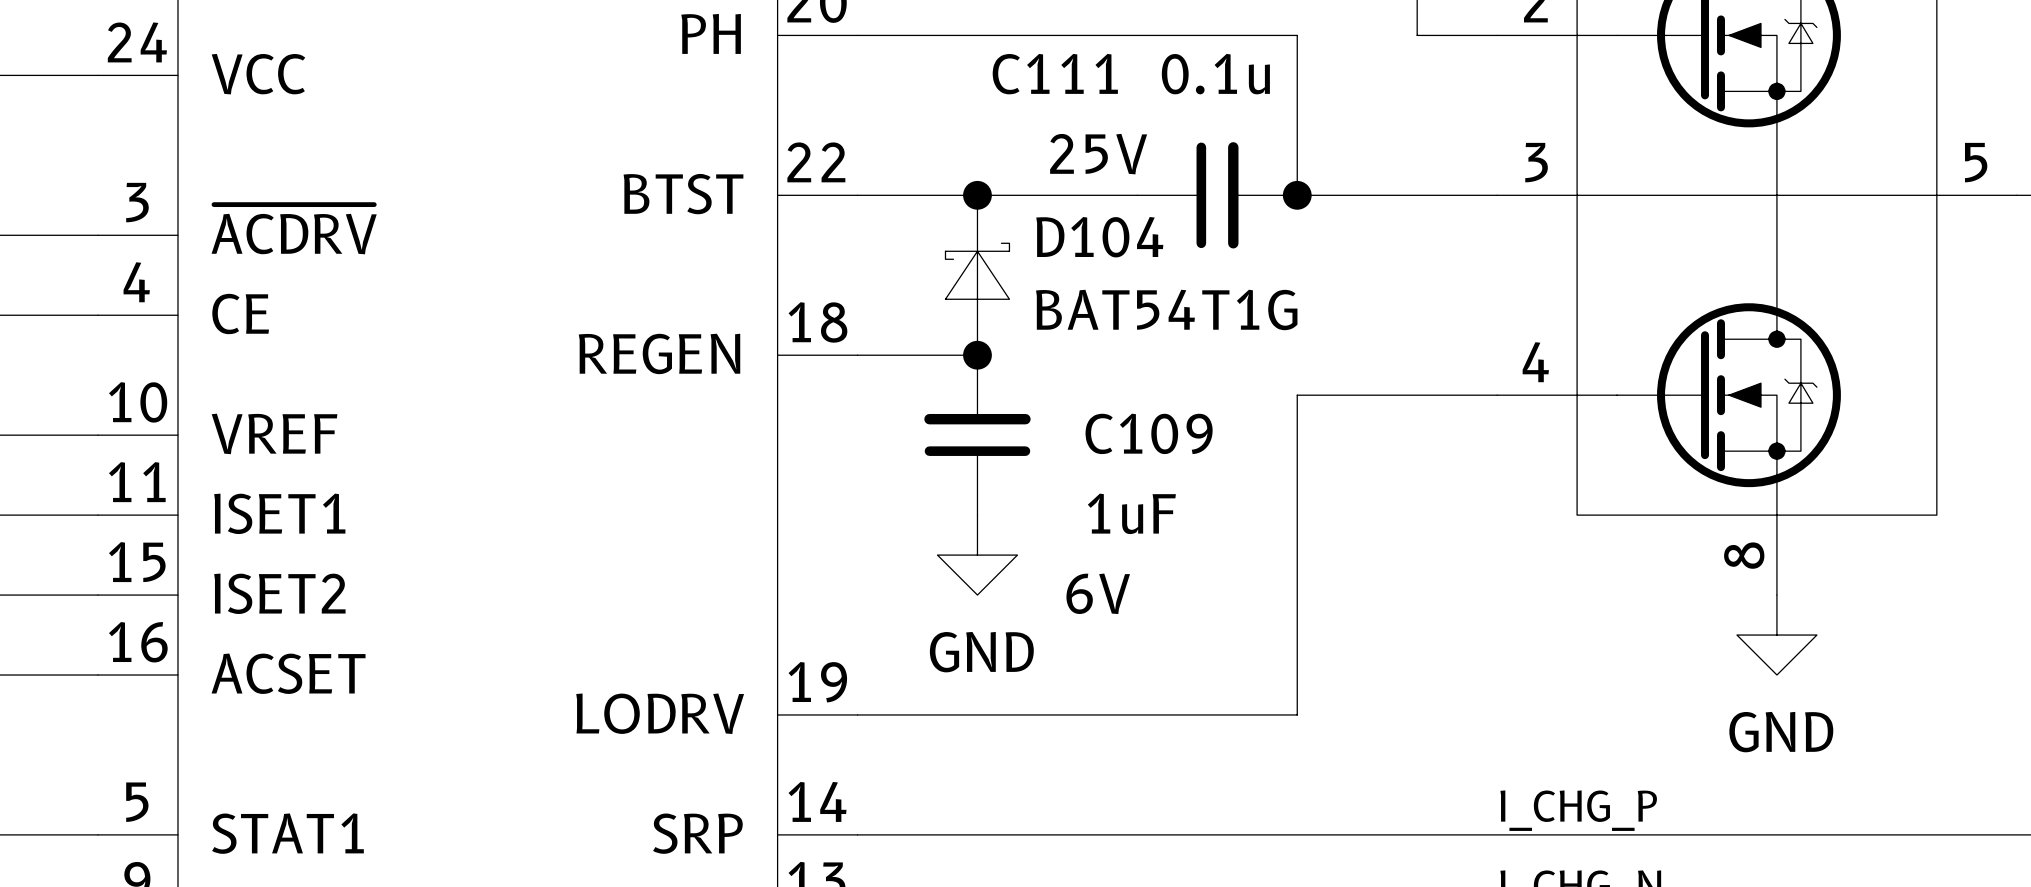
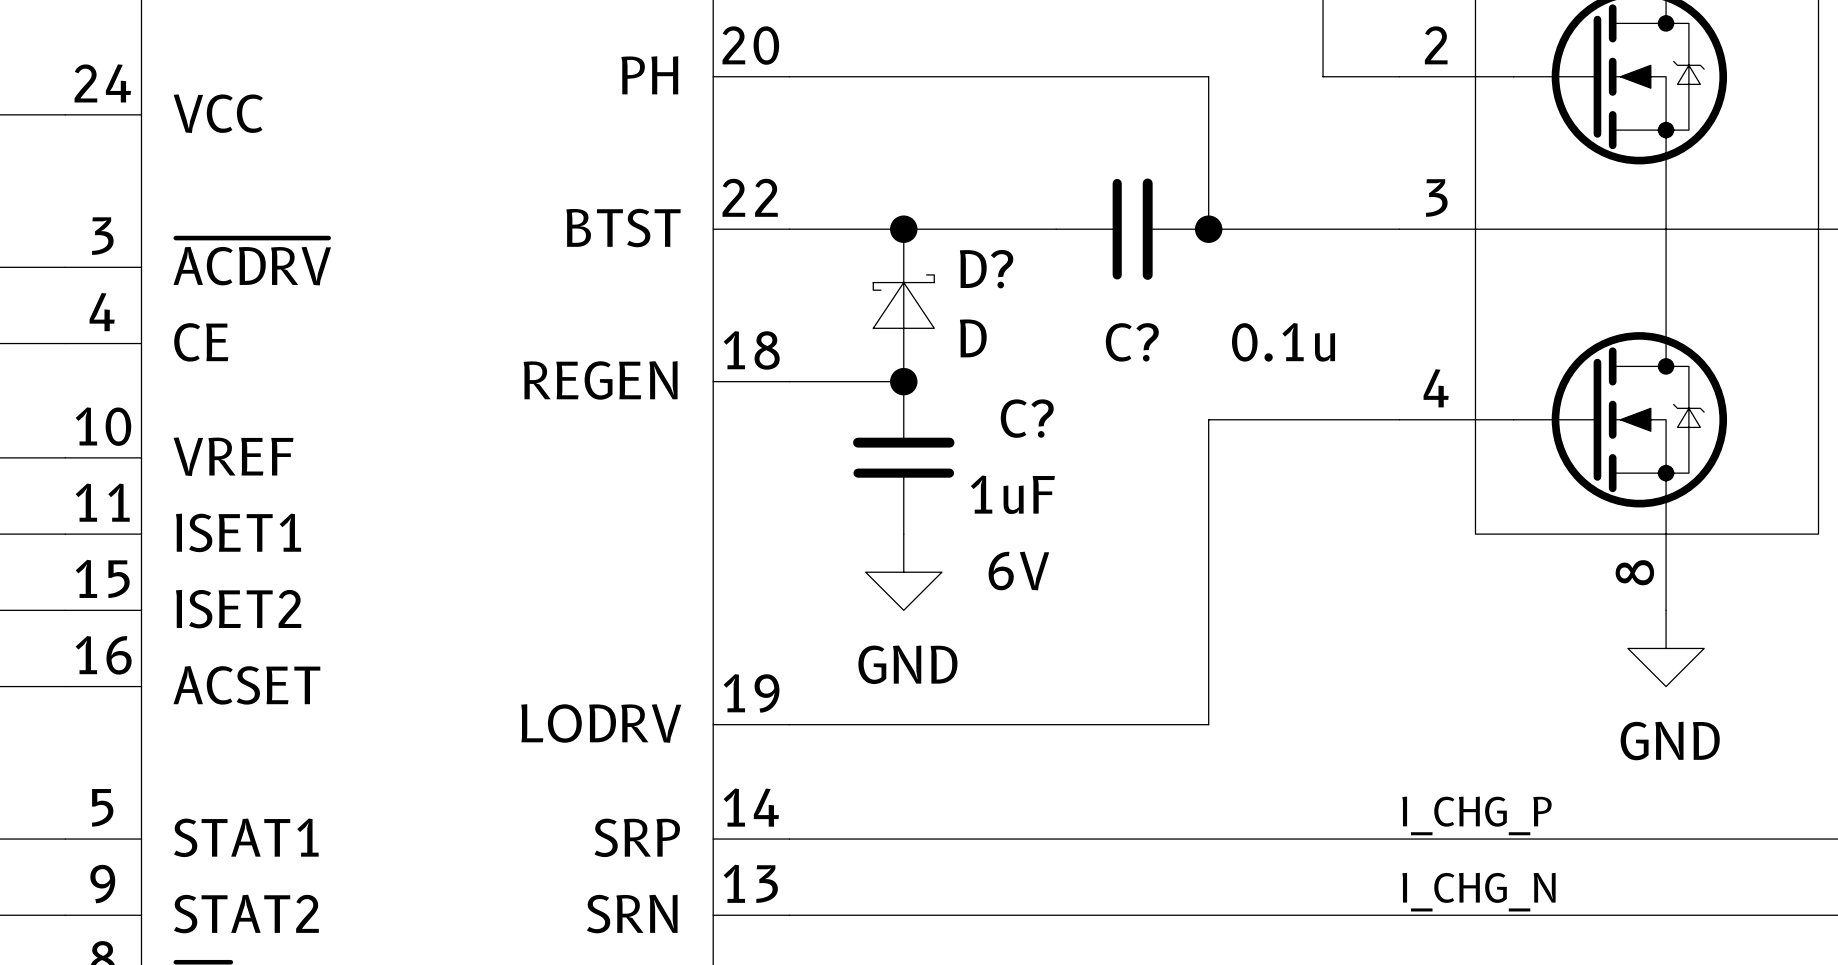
C111 name: C111 (1055, 74) -> C? (1132, 342)
C111 value position: 0.1u (1215, 74) -> 0.1u (1283, 342)
C111 text: 25V (1098, 154) -> none
D104 name: D104 (1099, 237) -> D? (986, 269)
D104 value: BAT54T1G (1166, 309) -> D (973, 338)
C109 name: C109 (1149, 433) -> C? (1027, 418)
C109 value position: 1uF (1131, 513) -> 1uF (1012, 494)
C109 text position: 6V (1098, 593) -> 6V (1018, 571)

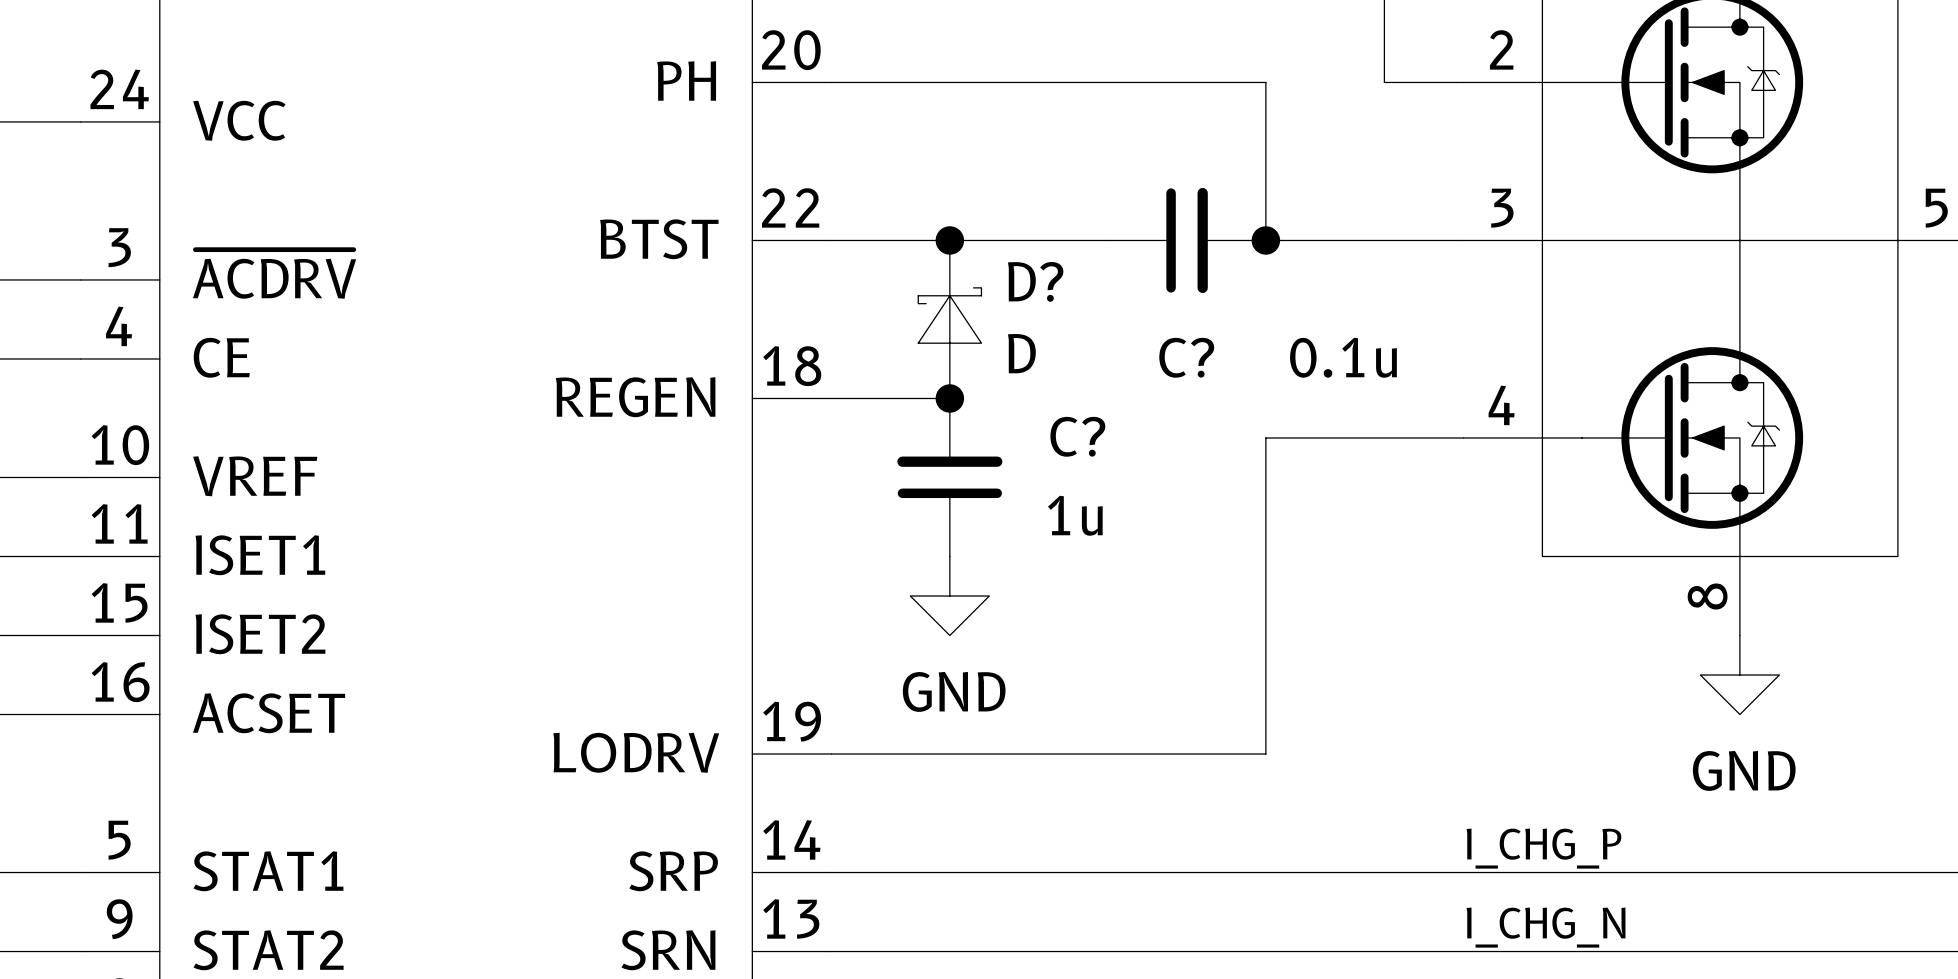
C? value: 1uF (1012, 494) -> 1u (1075, 515)
C? text: 6V (1018, 571) -> none

